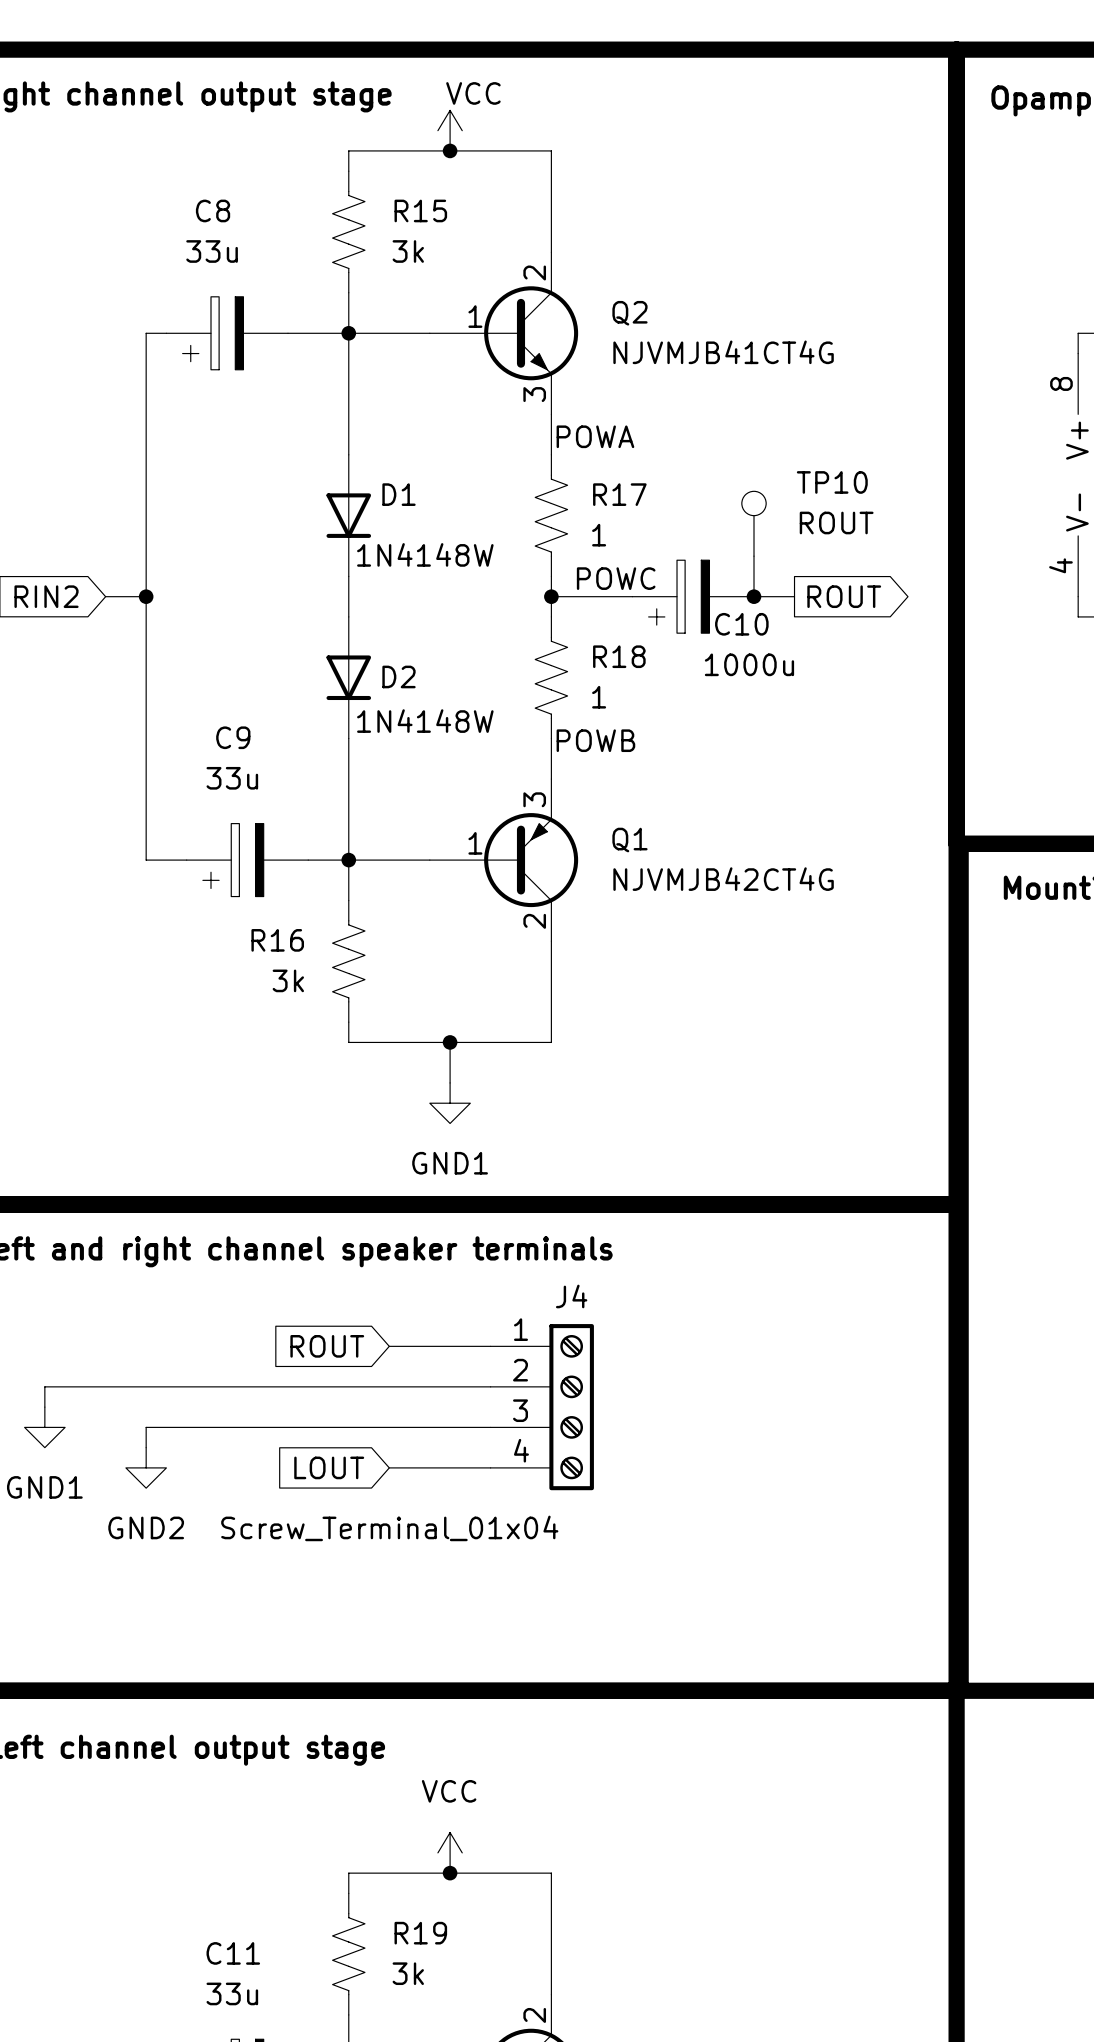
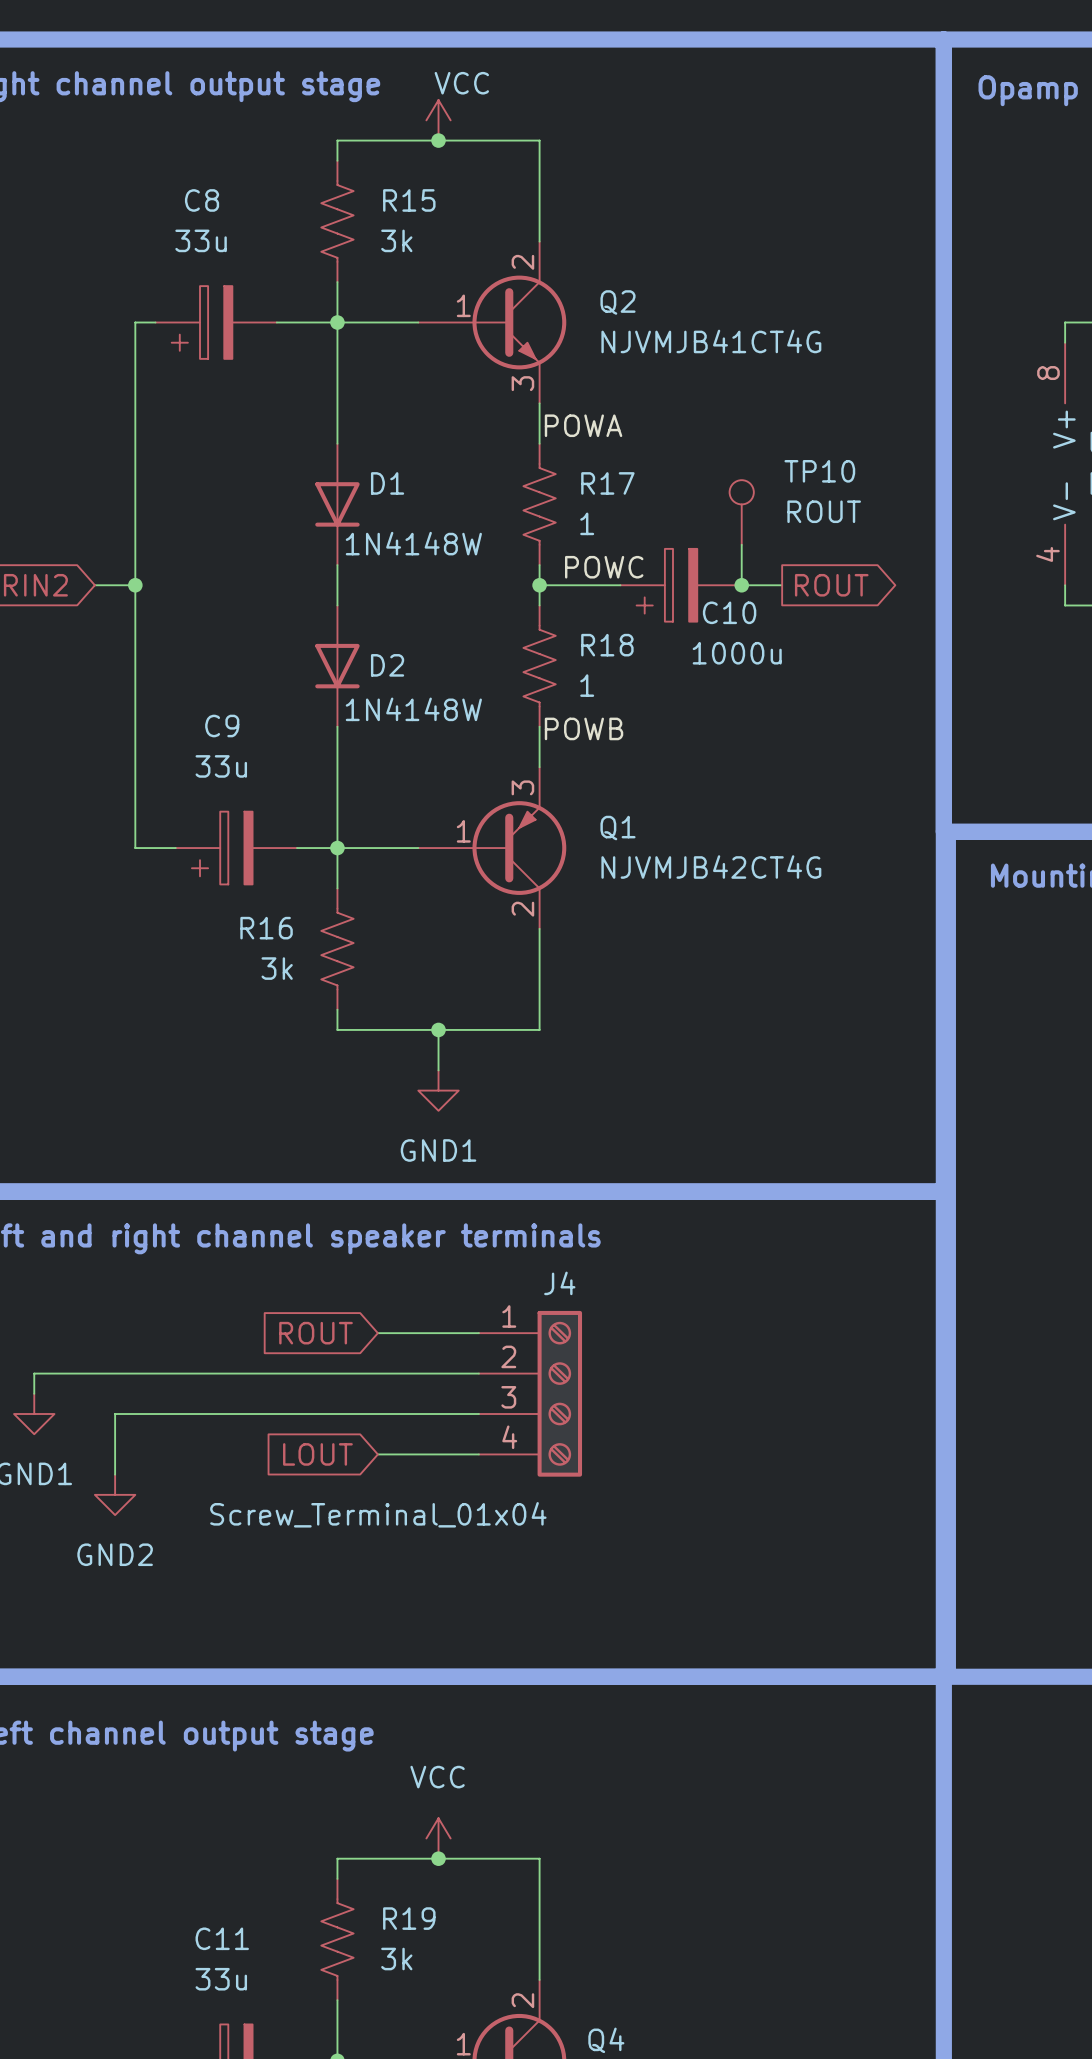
wire: (146, 1427) (146, 1447) -> (135, 1414) (115, 1414) (115, 1474)
power symbol position: GND2 (146, 1467) -> GND2 (115, 1494)

